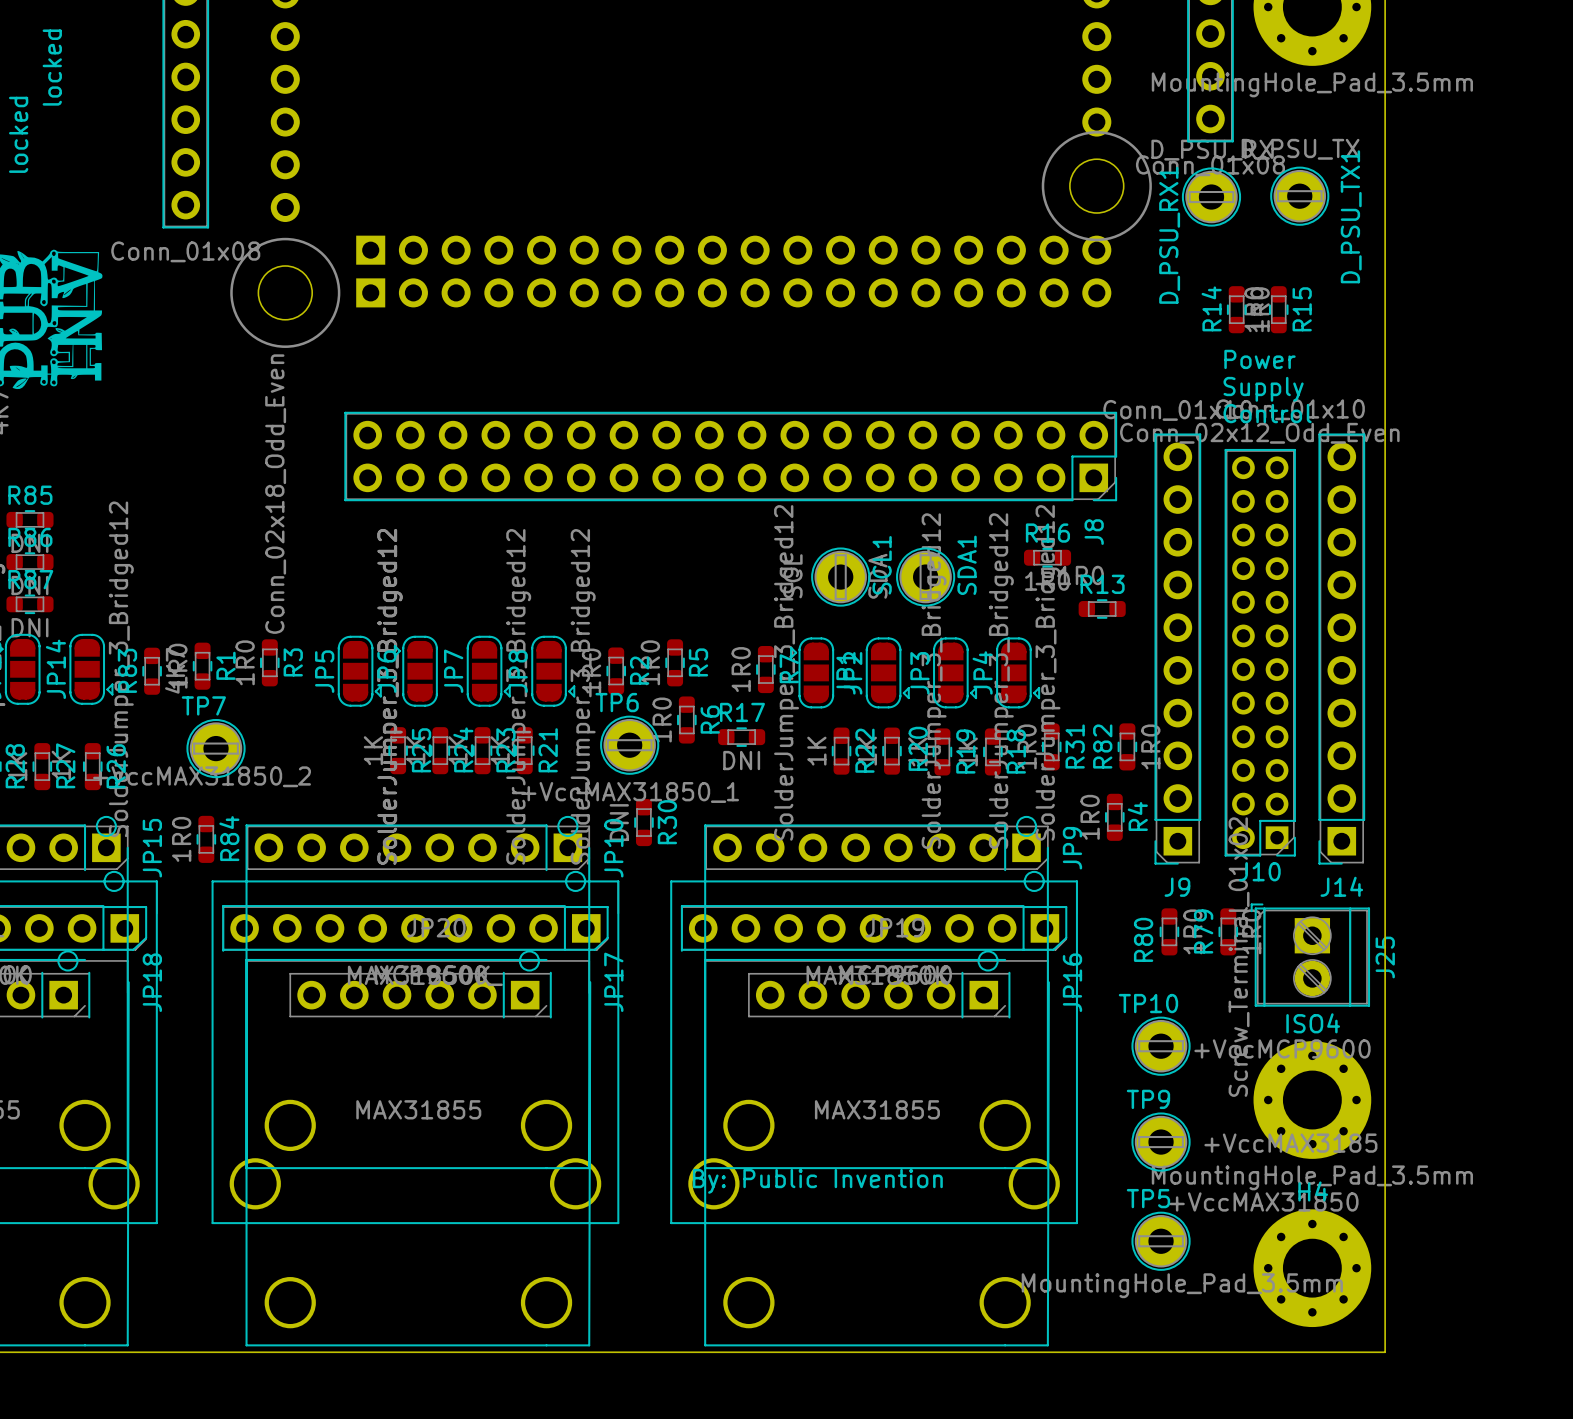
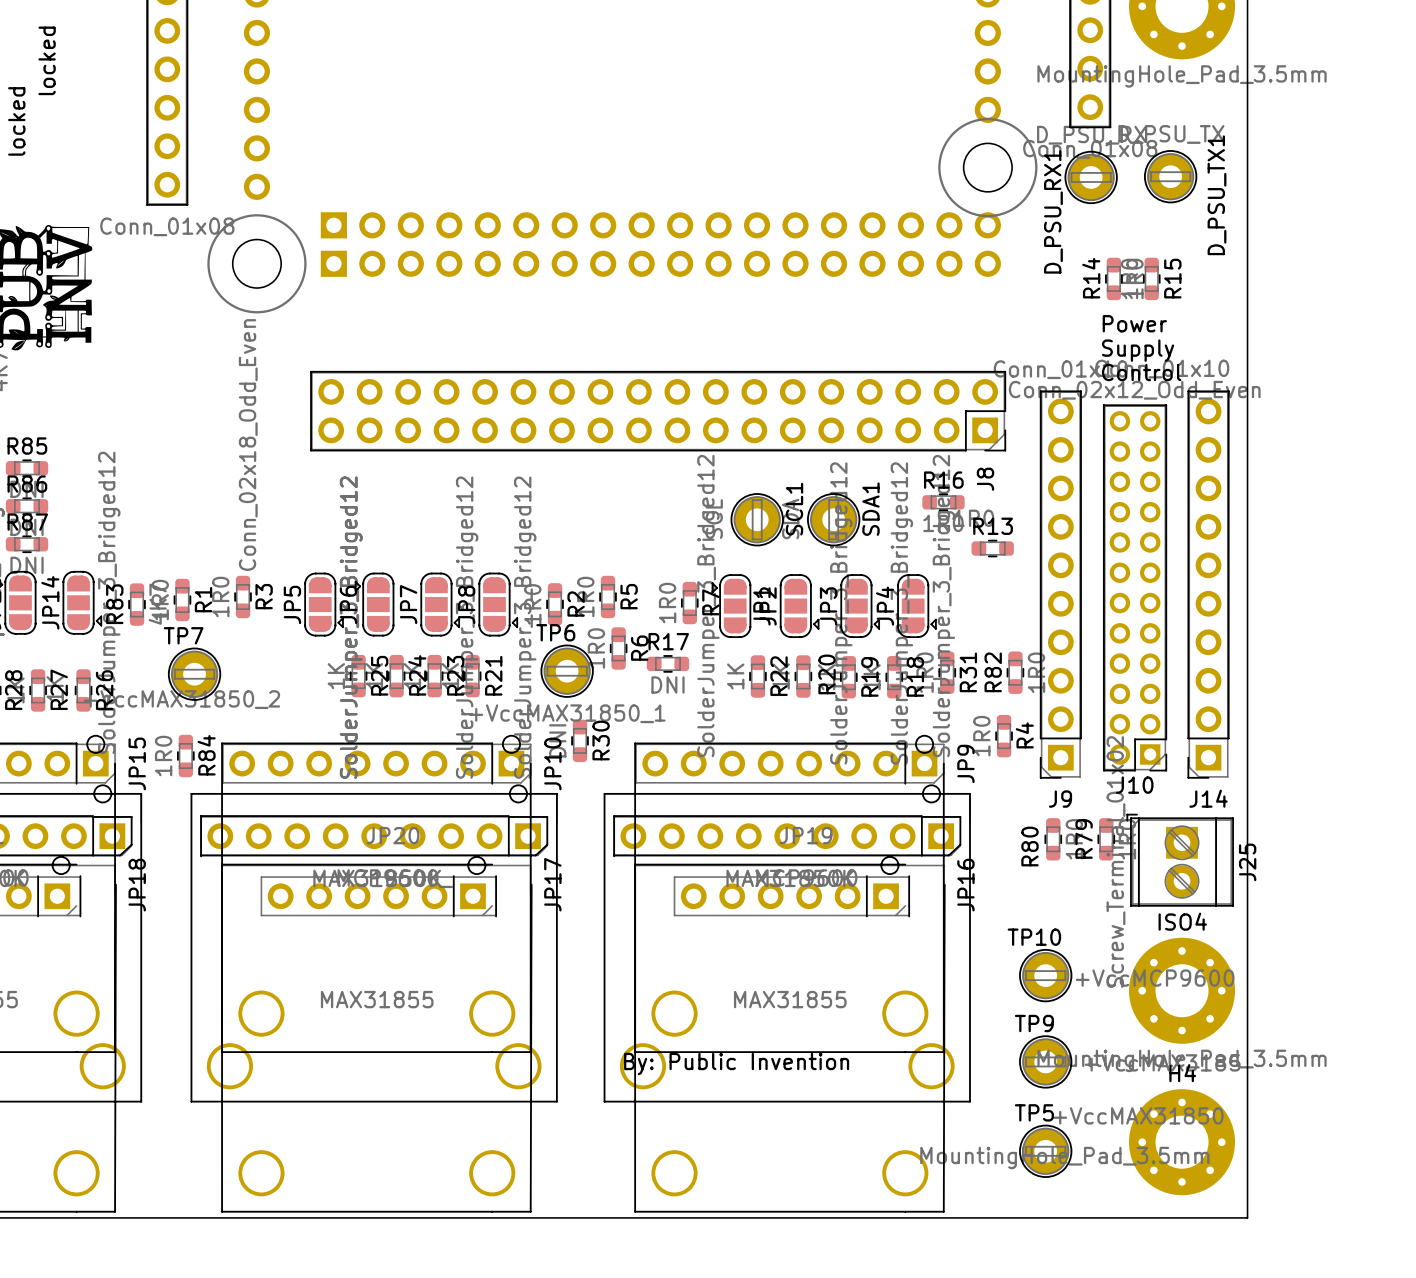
TP10 position: (1161, 1046) -> (1045, 975)
TP9 position: (1161, 1142) -> (1045, 1061)
TP5 position: (1161, 1241) -> (1045, 1151)

